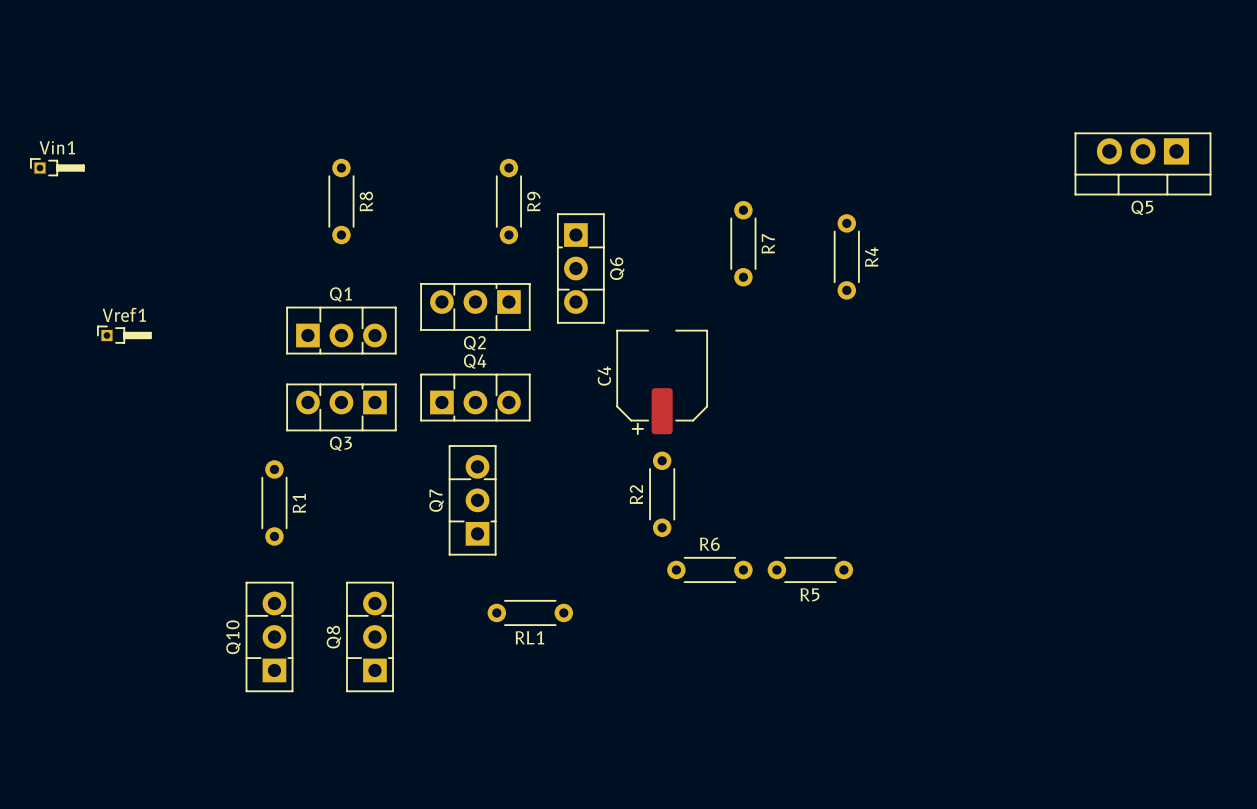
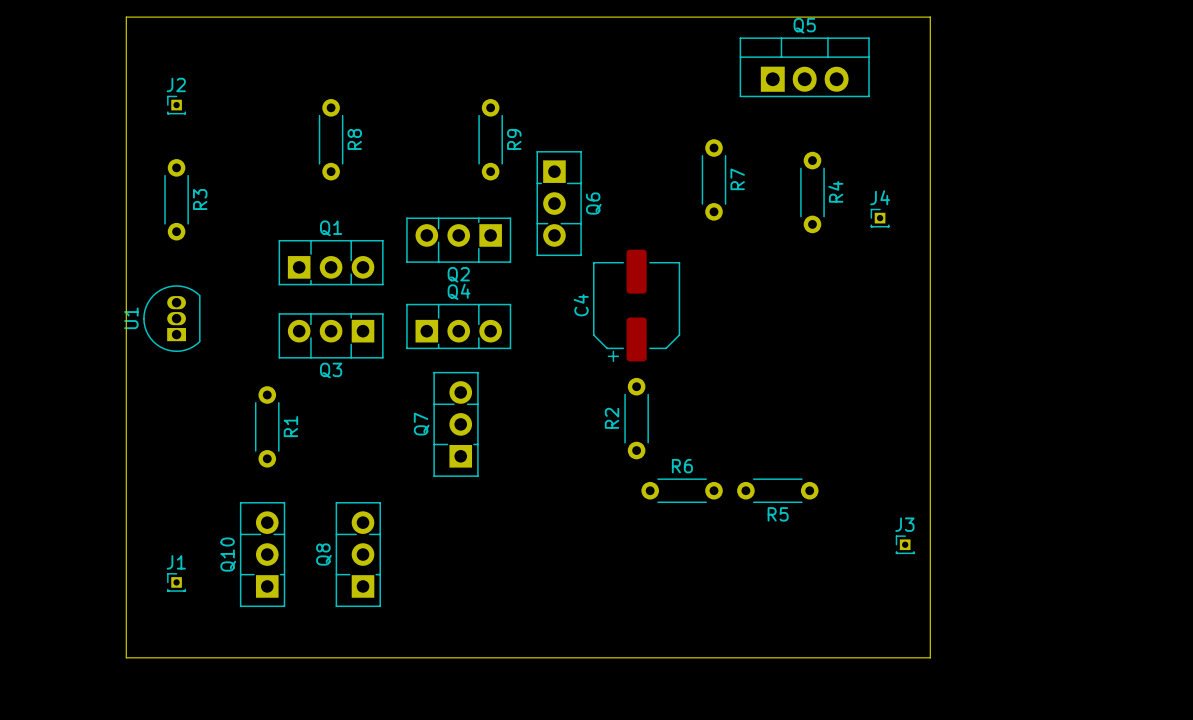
board edge: none -> (126, 17) (930, 17) (930, 657) (126, 657) (126, 17)
Q5 rotation: 0° (1142, 163) -> 180° (804, 67)
Q5 position: (1142, 163) -> (804, 67)
J2: none -> (176, 105)
Vin1: (57, 167) -> none
R3: none -> (176, 199)
J4: none -> (880, 218)
C4 footprint: [616, 329, 708, 435] -> [593, 249, 681, 363]
Vref1: (124, 334) -> none
U1: none -> (171, 318)
RL1: (530, 612) -> none
J3: none -> (905, 544)
J1: none -> (176, 582)

